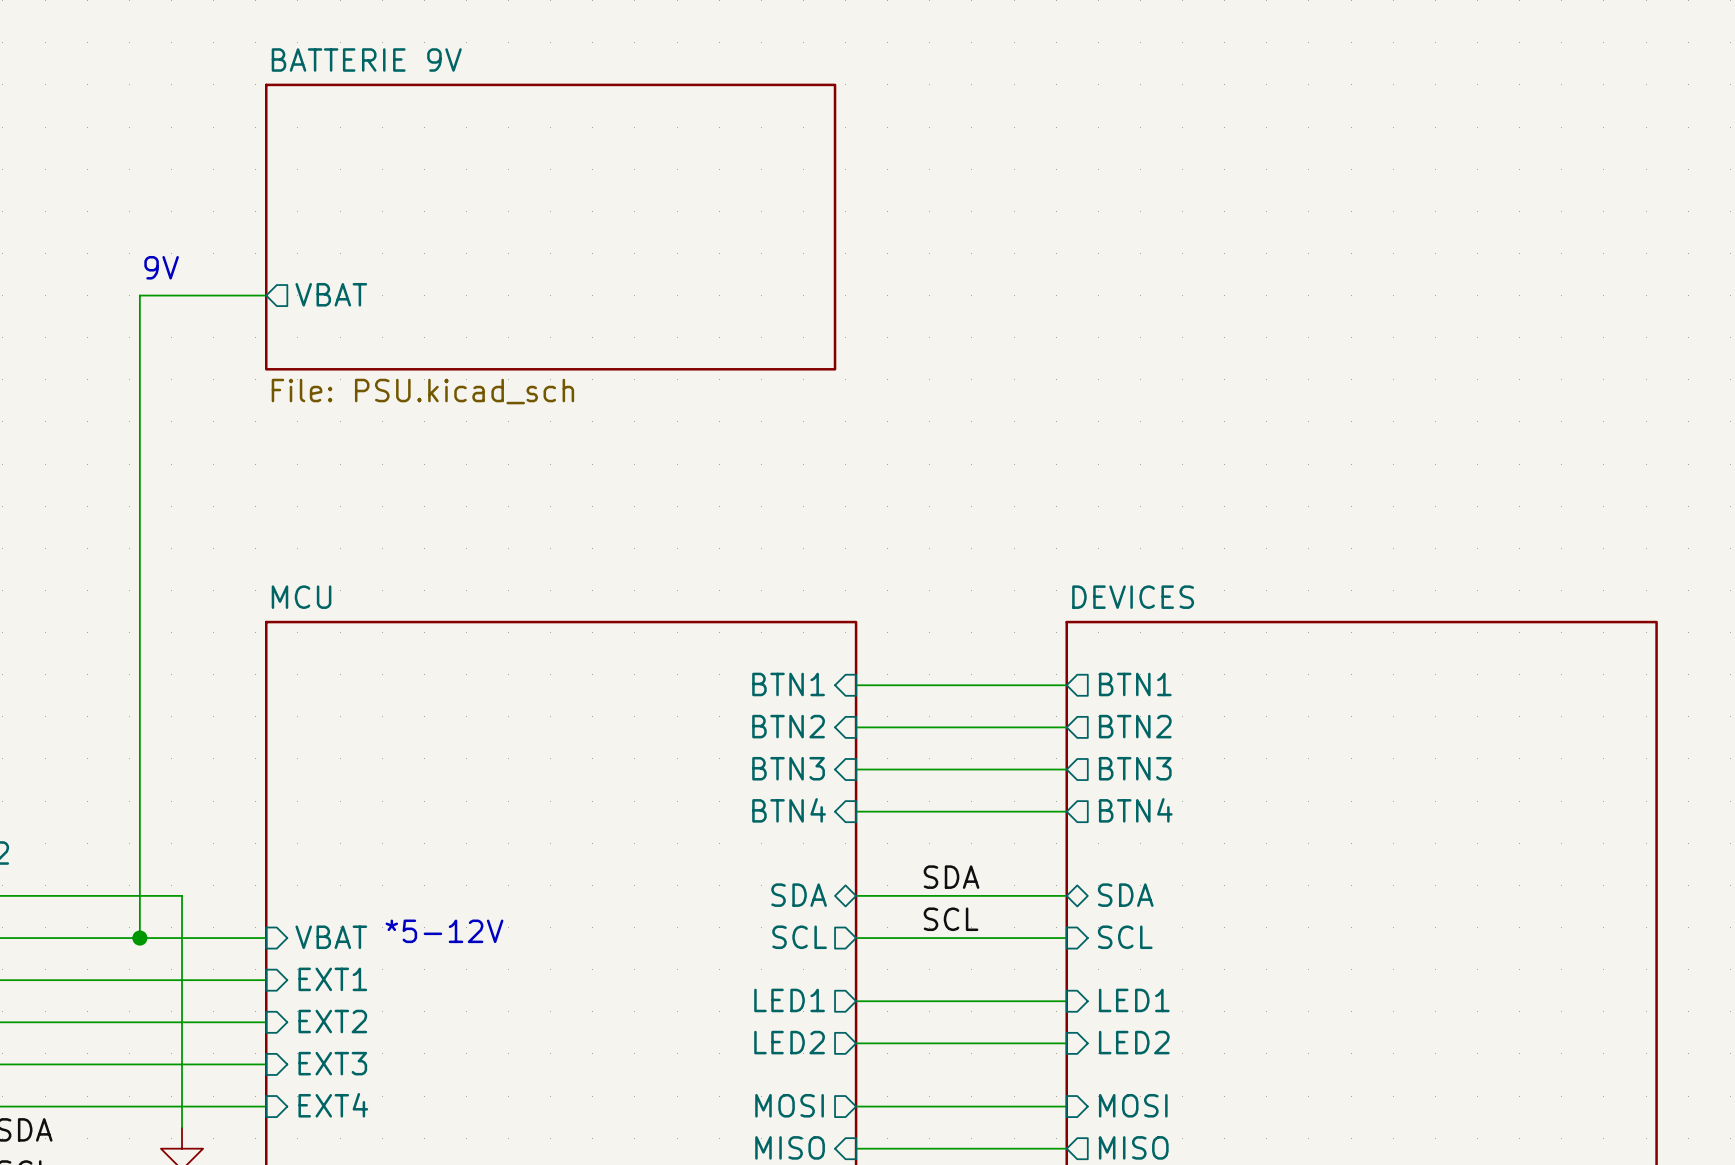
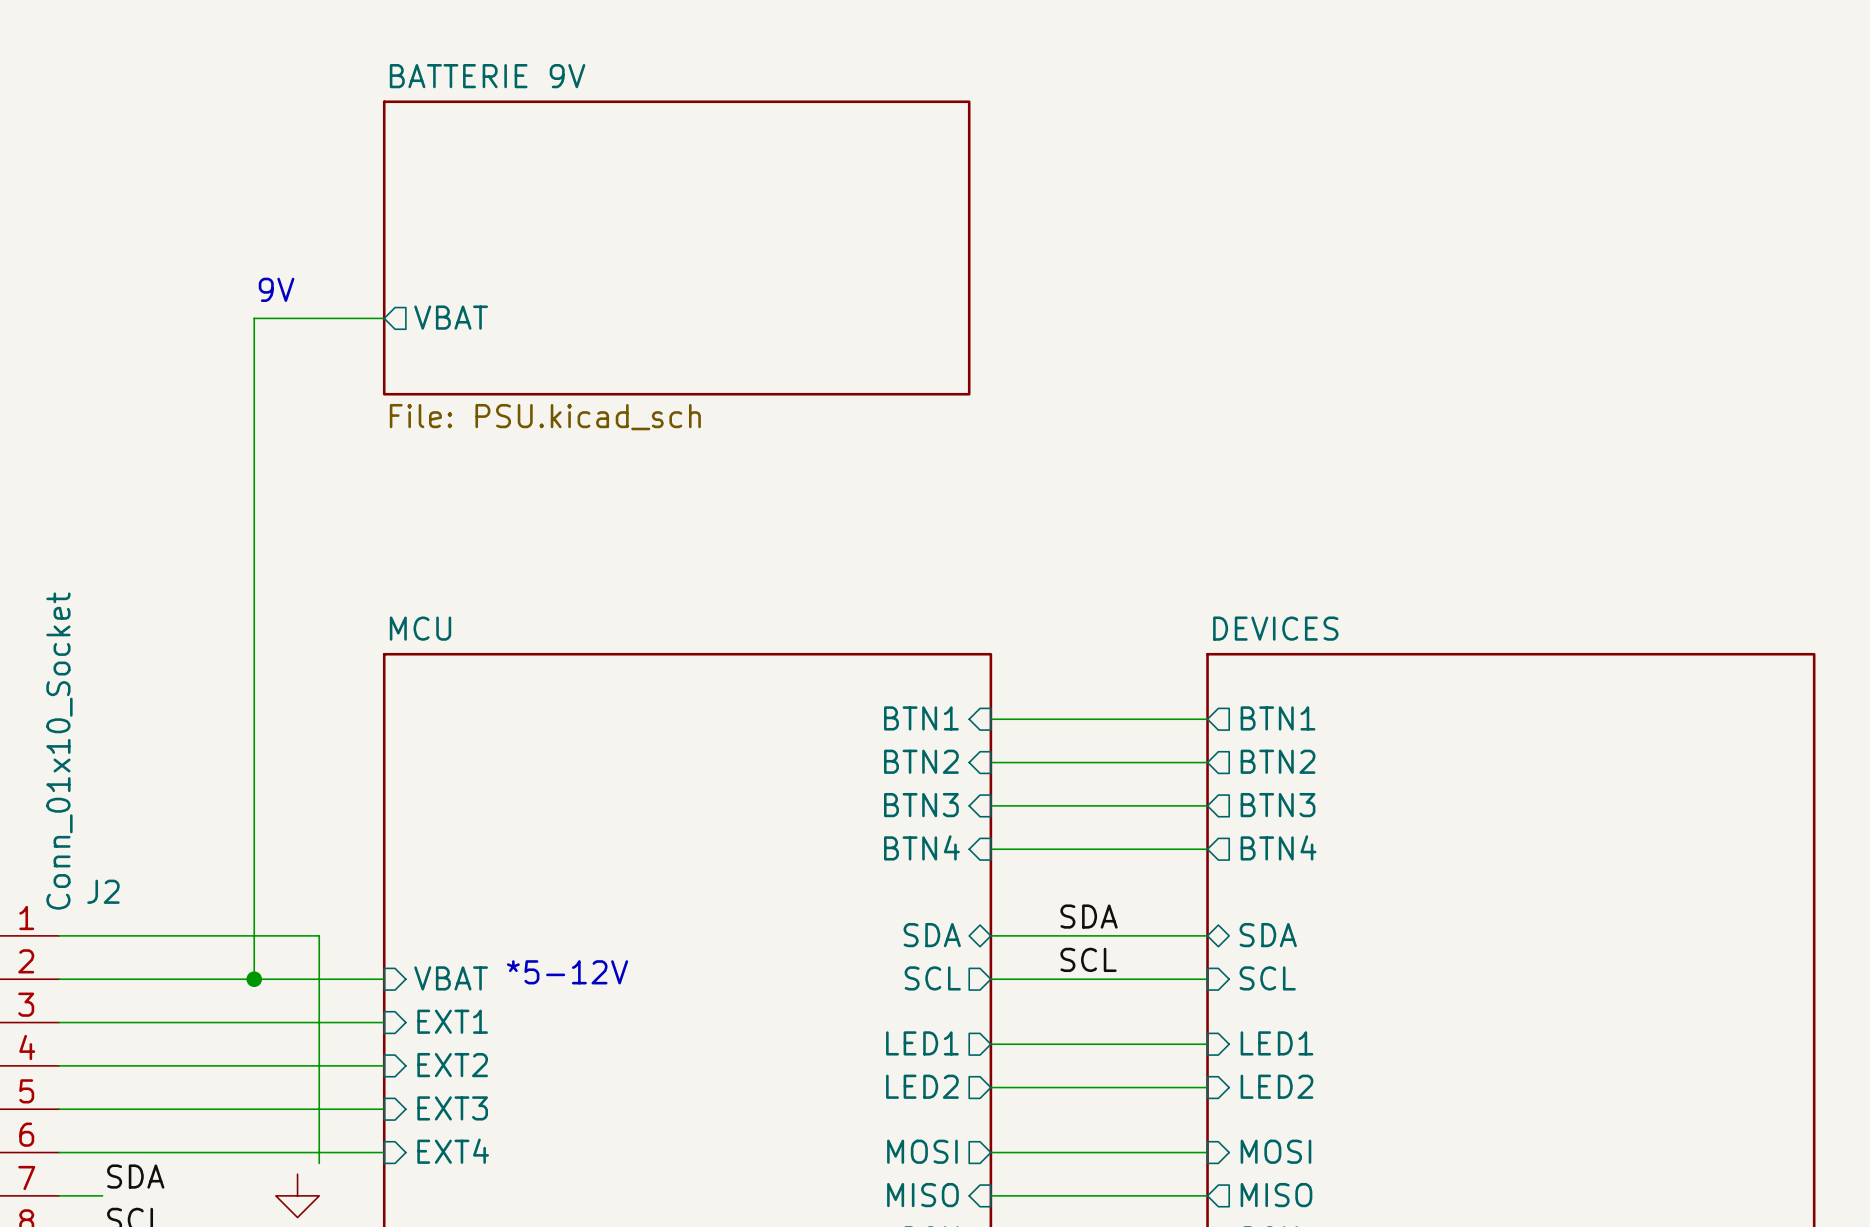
wire: (182, 895) (182, 1127) -> (297, 935) (319, 935) (319, 1163)

